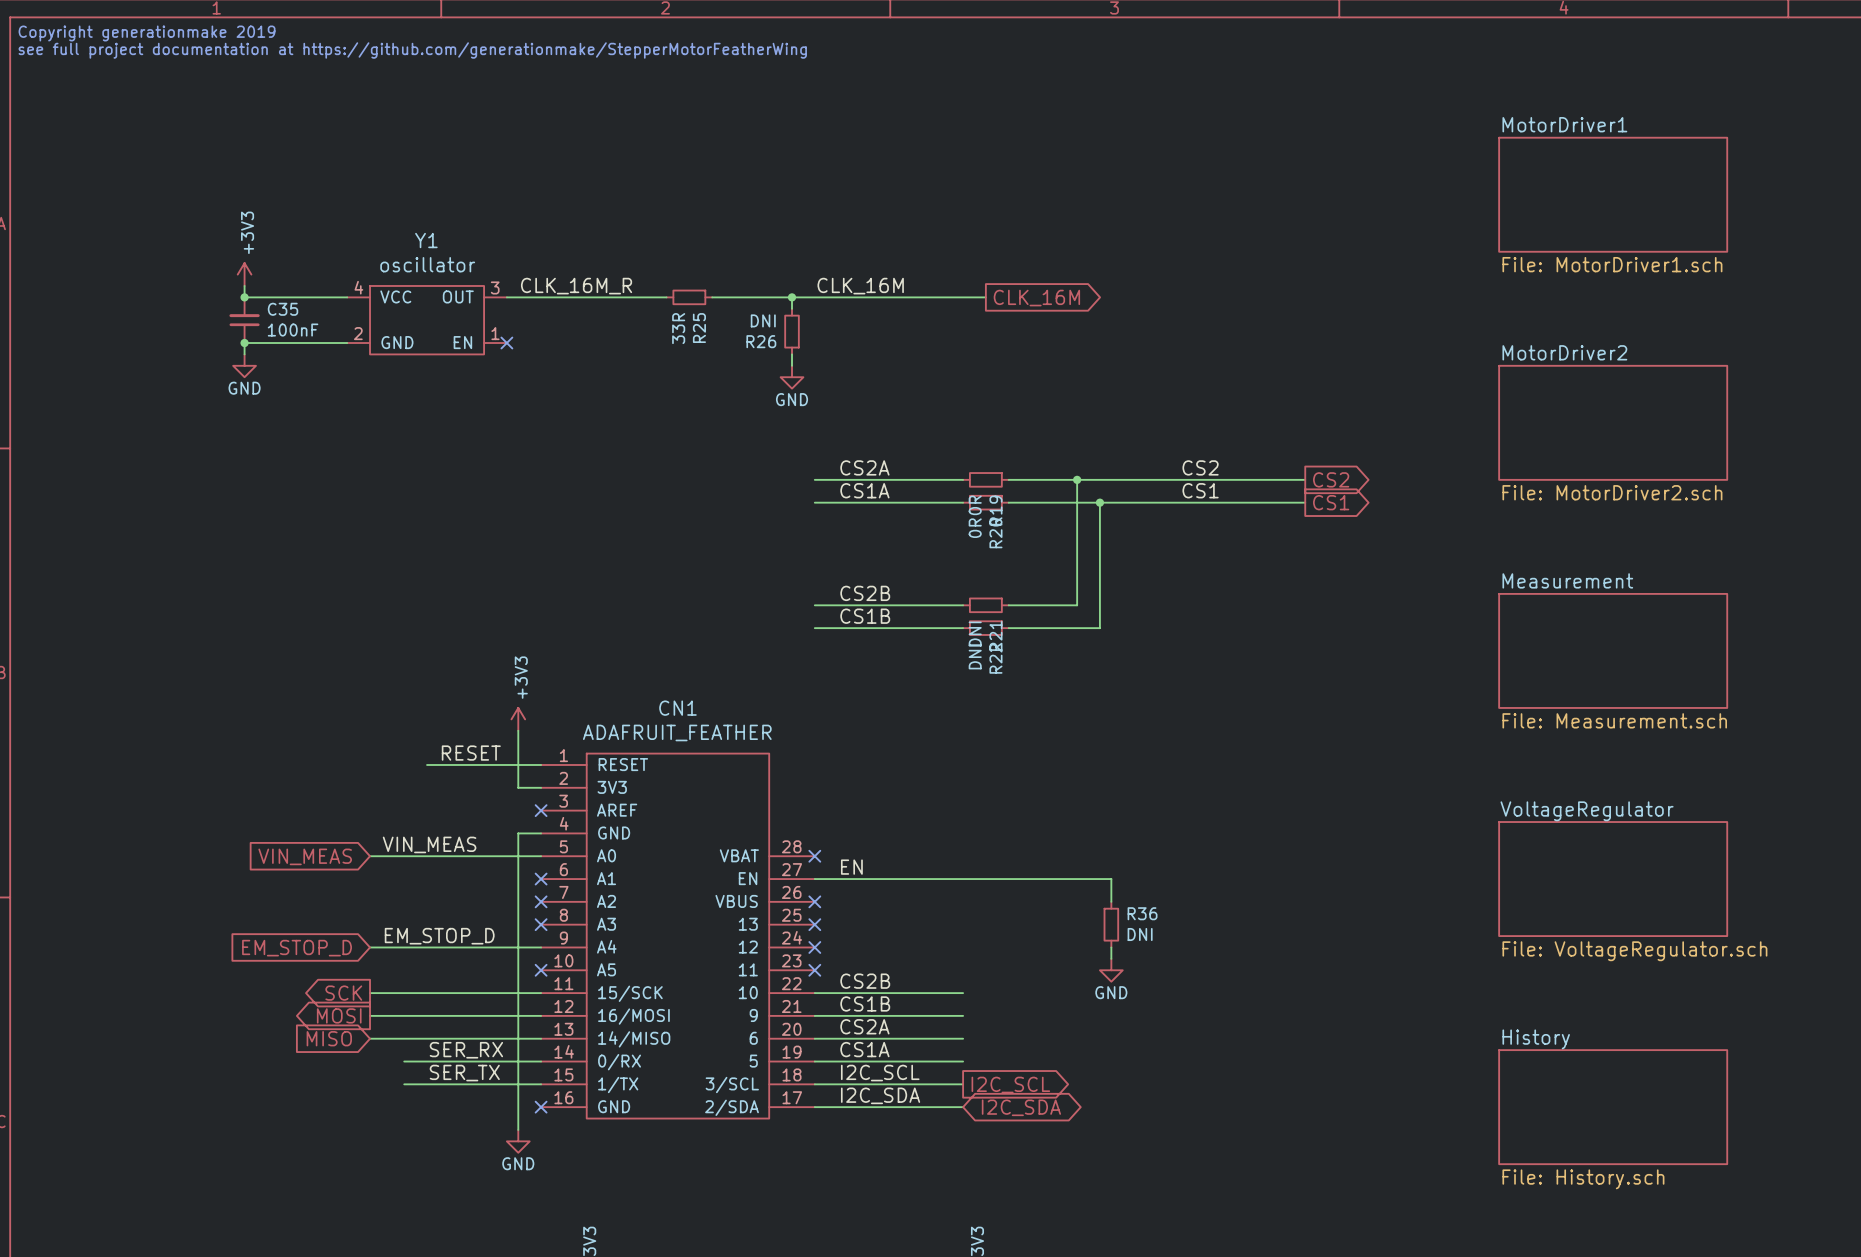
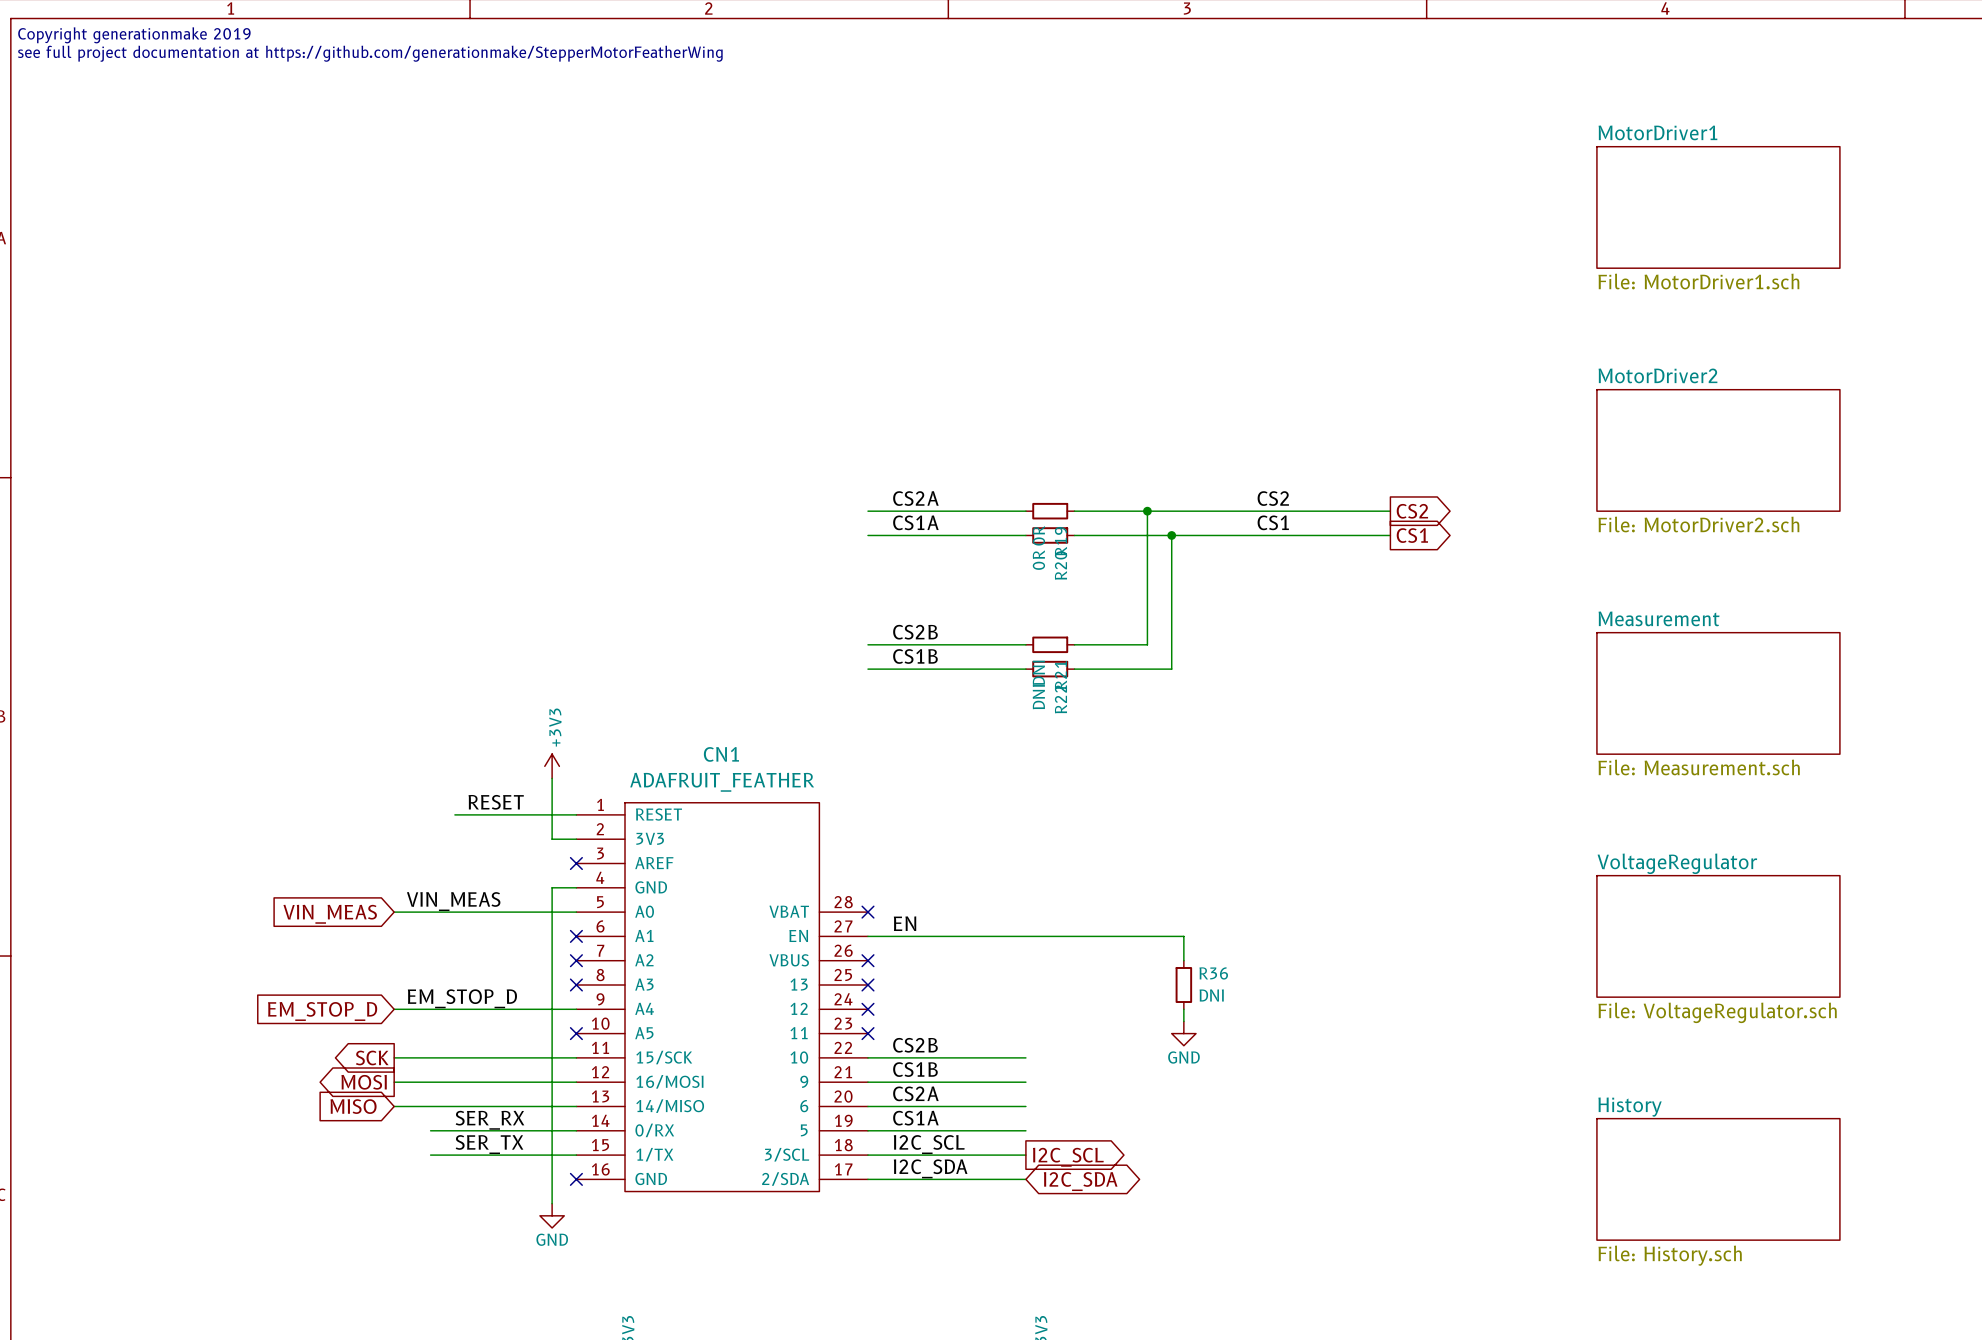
power symbol: +3V3 (244, 274) -> none
wire: (244, 285) (244, 297) (347, 297) -> none
label: CLK_16M_R (576, 286) -> none
label: CLK_16M (860, 286) -> none
junction: (244, 297) -> none
wire: (506, 297) (666, 297) -> none
R25: 33R (689, 297) -> none
wire: (712, 297) (985, 297) -> none
wire: (792, 297) (792, 308) -> none
junction: (792, 297) -> none
global label: CLK_16M (1036, 298) -> none
C35: 100nF (244, 320) -> none
Y1: oscillator (427, 320) -> none
R26: DNI (792, 331) -> none
junction: (244, 343) -> none
wire: (347, 343) (244, 343) (244, 354) -> none
no-connect mark: (506, 343) -> none
wire: (792, 354) (792, 365) -> none
power symbol: GND (244, 365) -> none
power symbol: GND (792, 377) -> none

